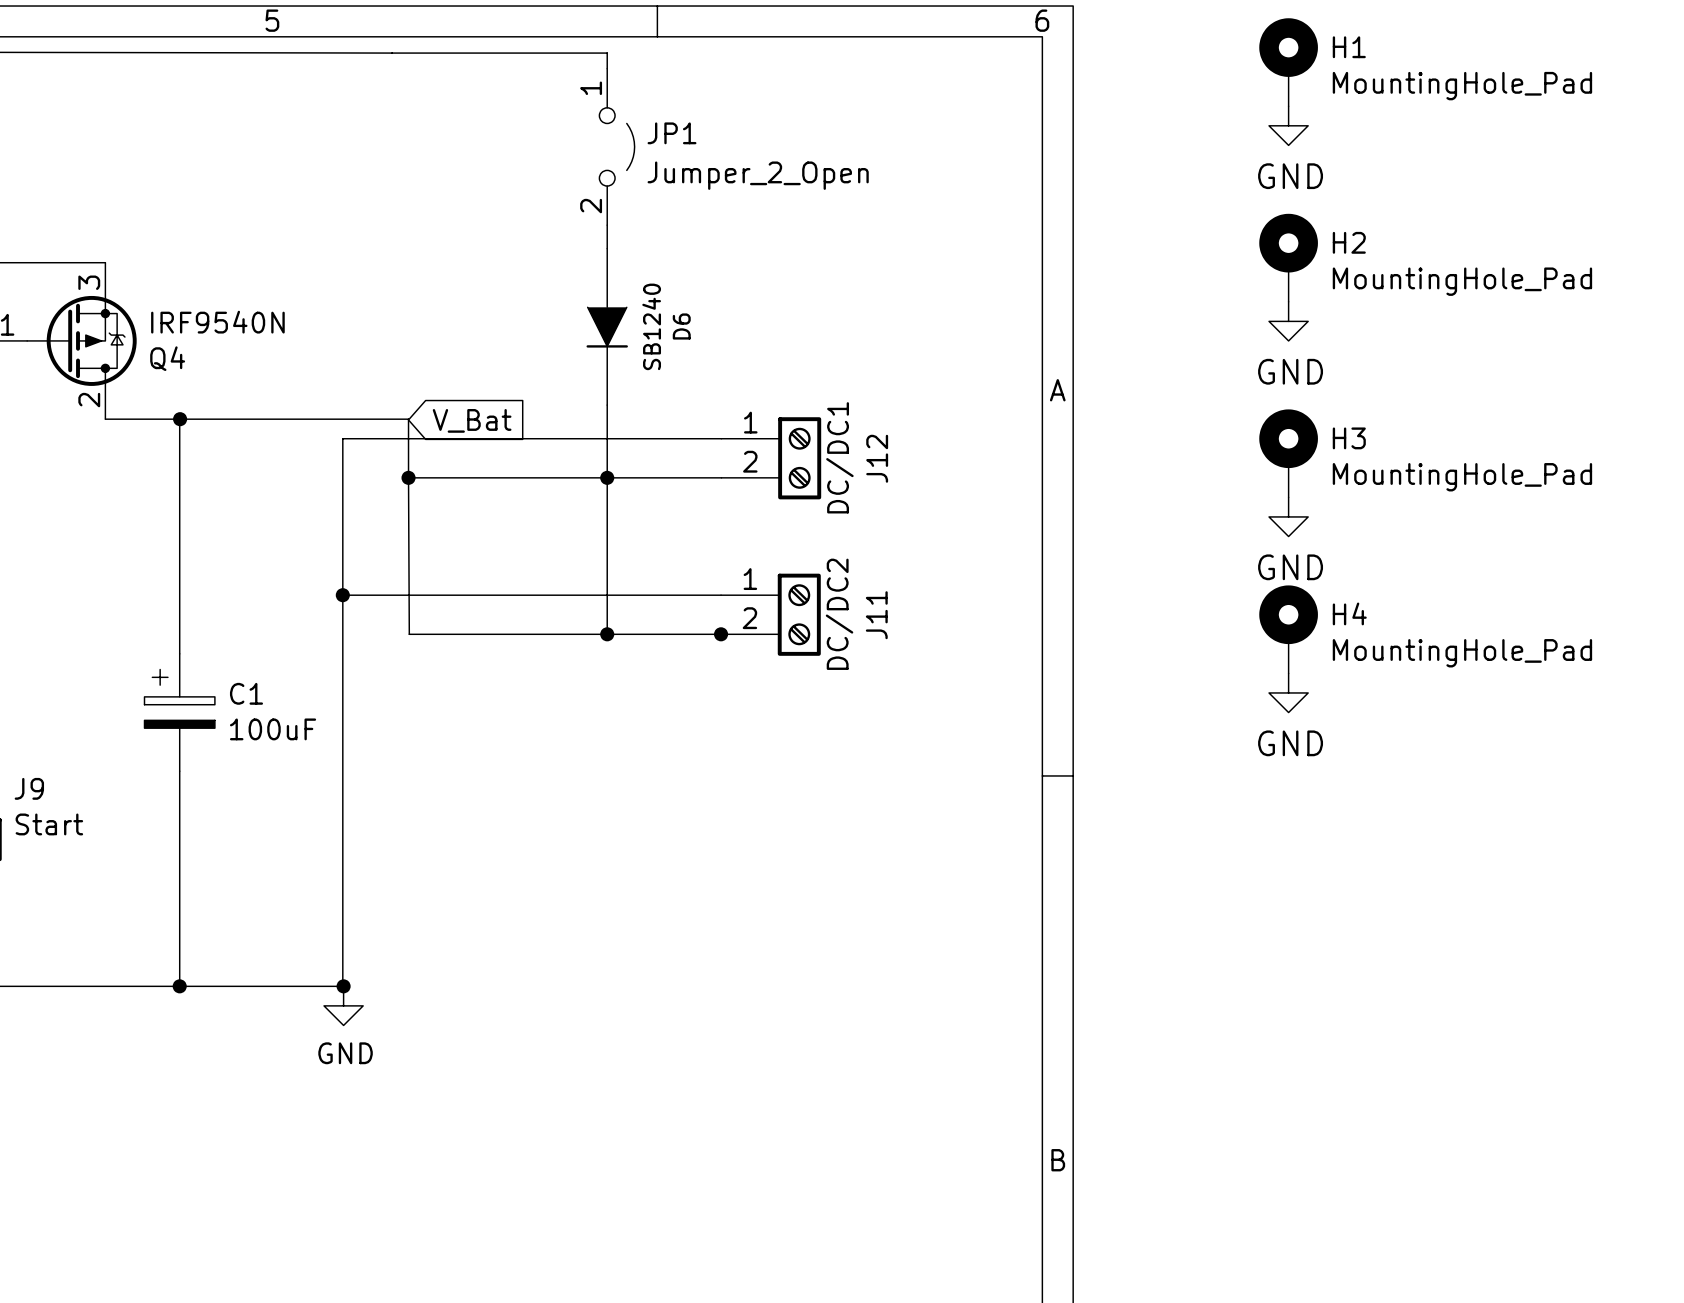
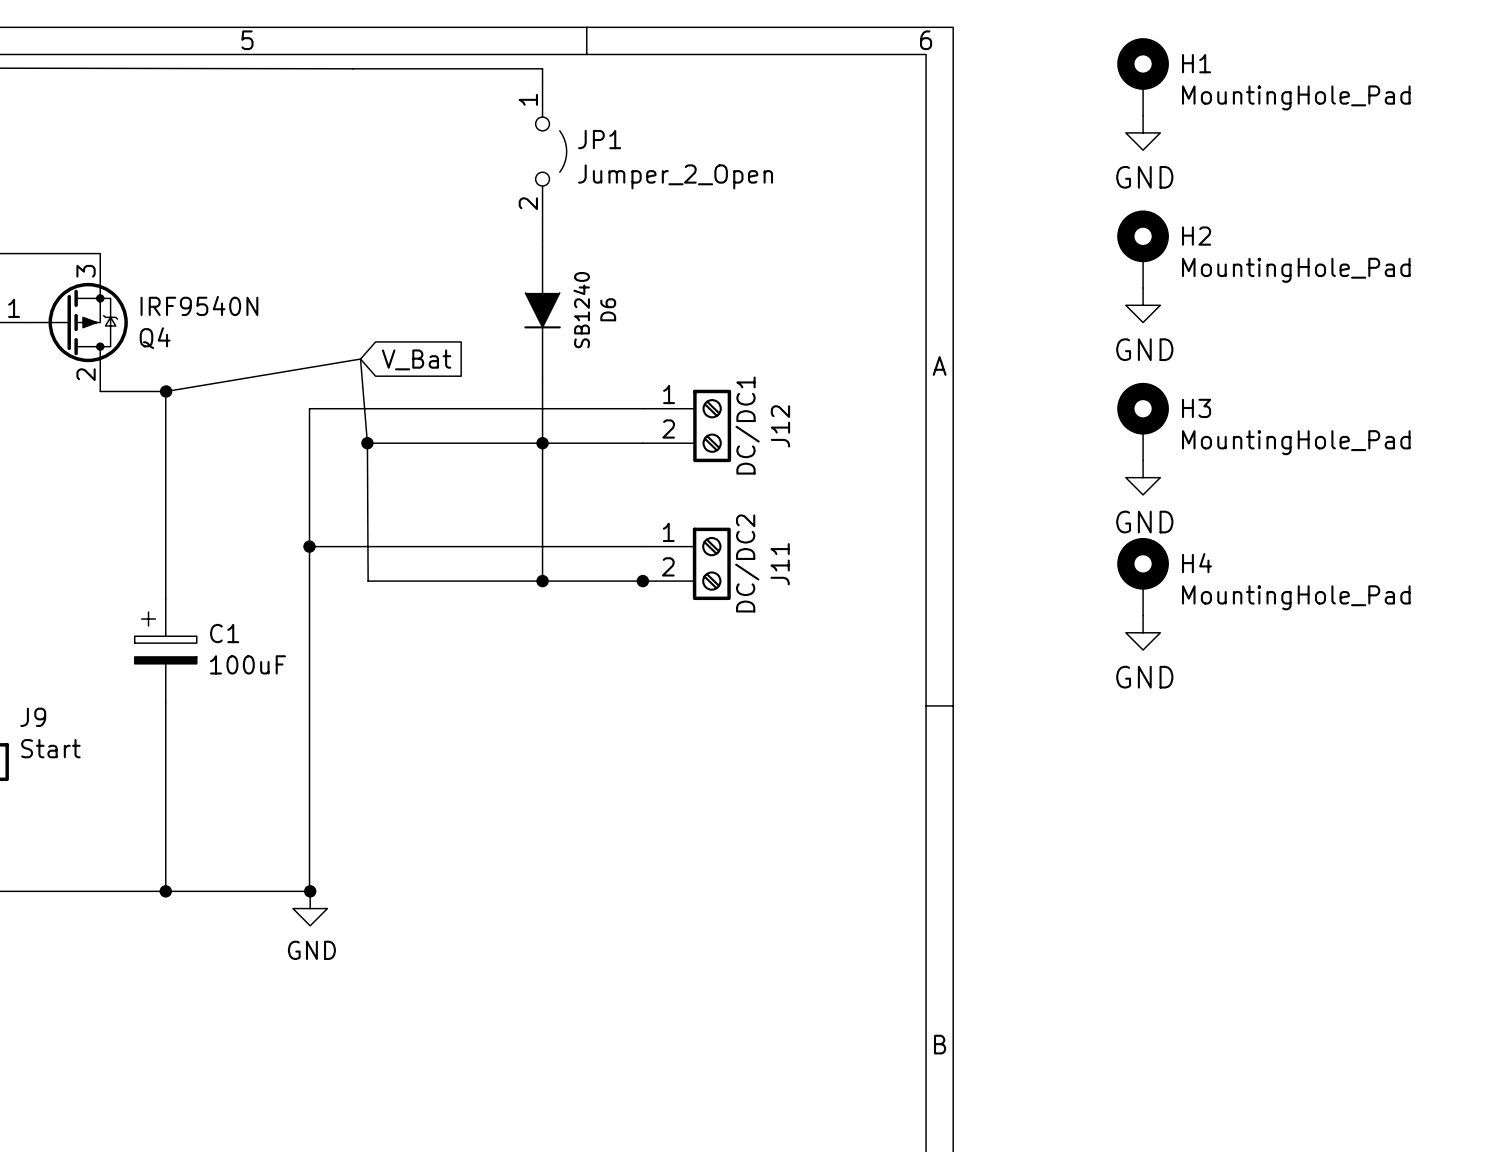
wire: (180, 419) (408, 419) (408, 477) -> (166, 391) (360, 359) (367, 443)
global label position: V_Bat (472, 420) -> V_Bat (416, 359)

